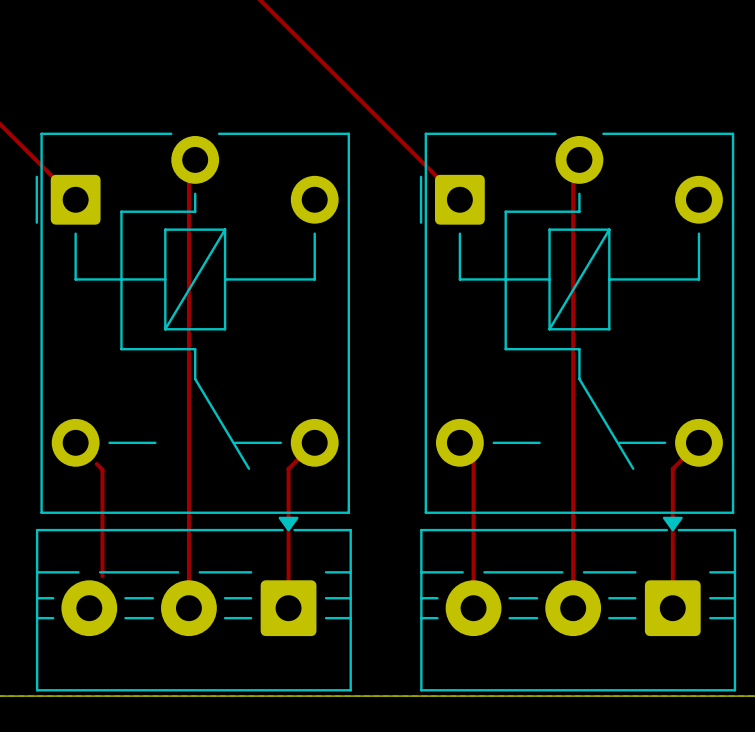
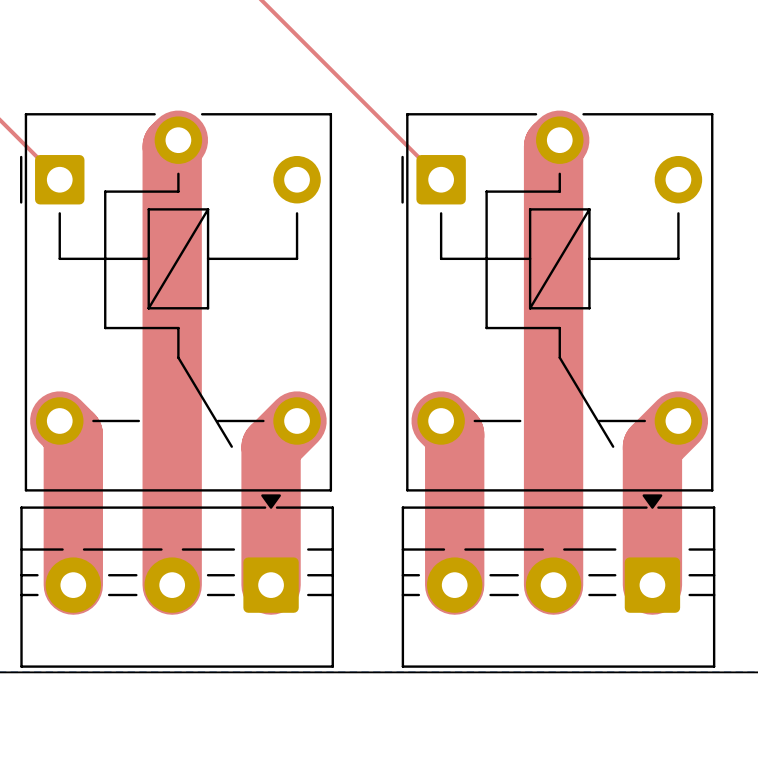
top track width: thin (195, 159) (188, 166) (188, 608) -> thick (178, 140) (172, 146) (172, 585)
top track width: thin (579, 159) (573, 166) (573, 608) -> thick (559, 140) (553, 146) (553, 585)
top track: none -> (59, 420) (73, 434) (73, 585)
top track width: thin (314, 442) (288, 468) (288, 608) -> thick (297, 420) (271, 446) (271, 585)
top track width: thin (459, 442) (473, 456) (473, 608) -> thick (441, 420) (454, 434) (454, 585)
top track width: thin (698, 442) (672, 468) (672, 608) -> thick (678, 420) (652, 446) (652, 585)
top track: (96, 463) (102, 469) (102, 576) -> none

